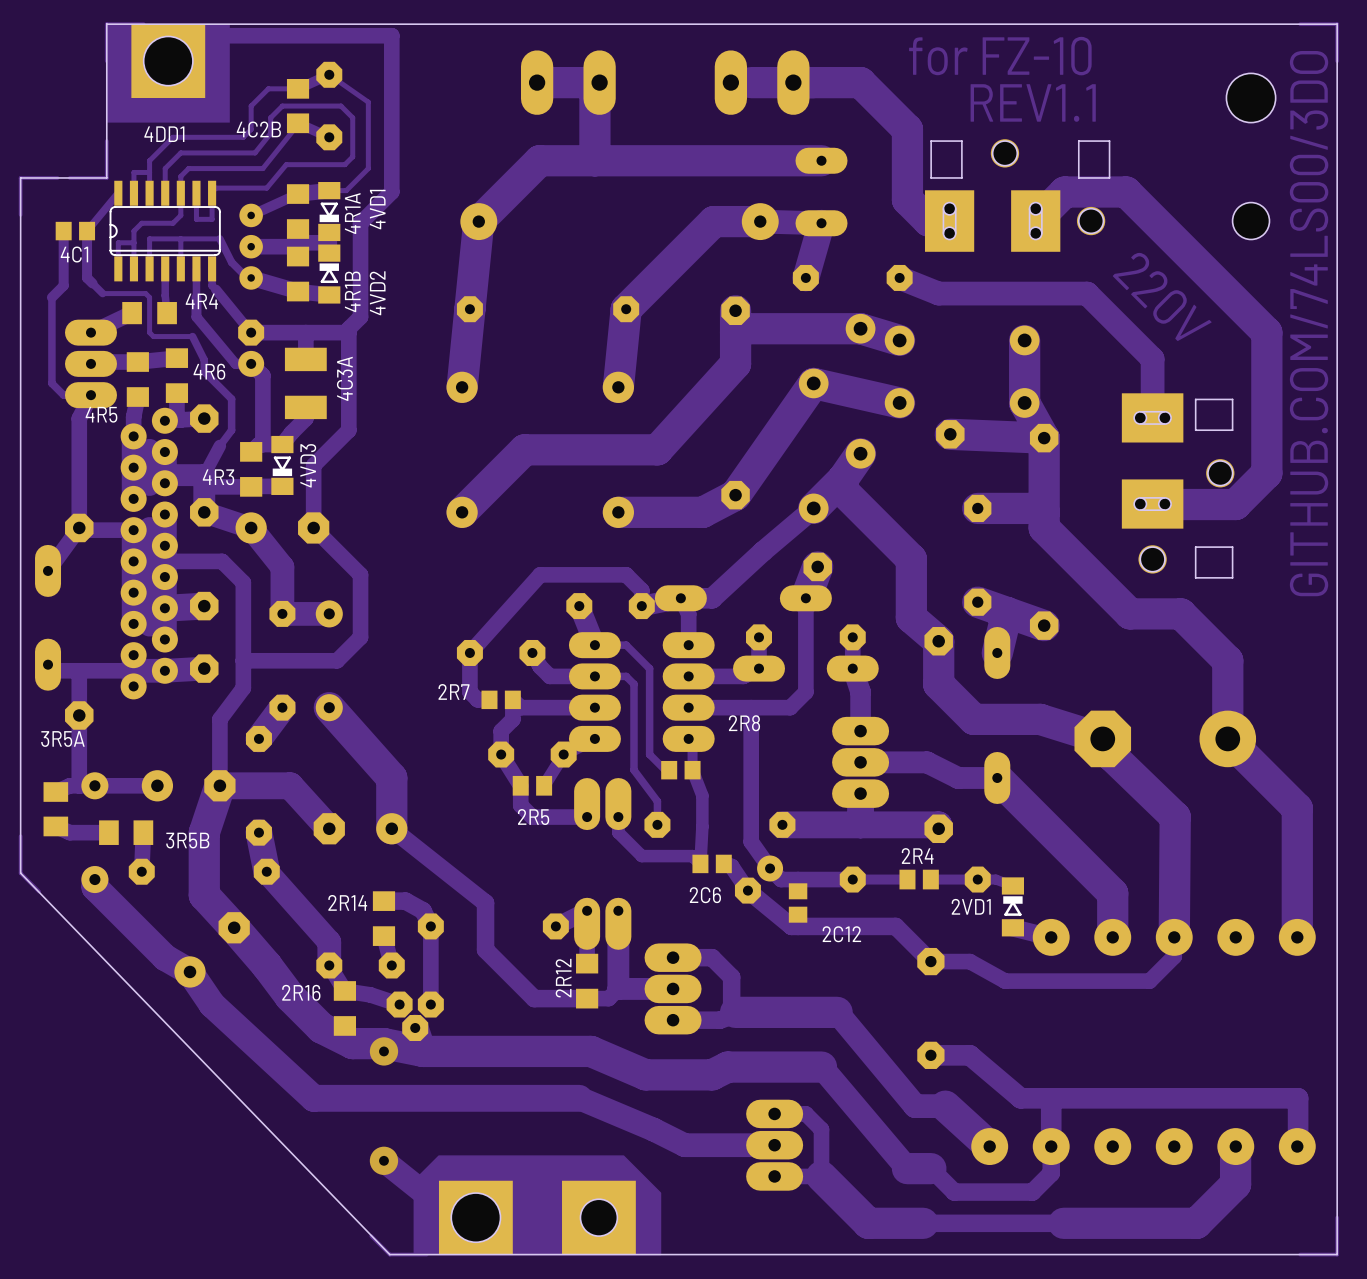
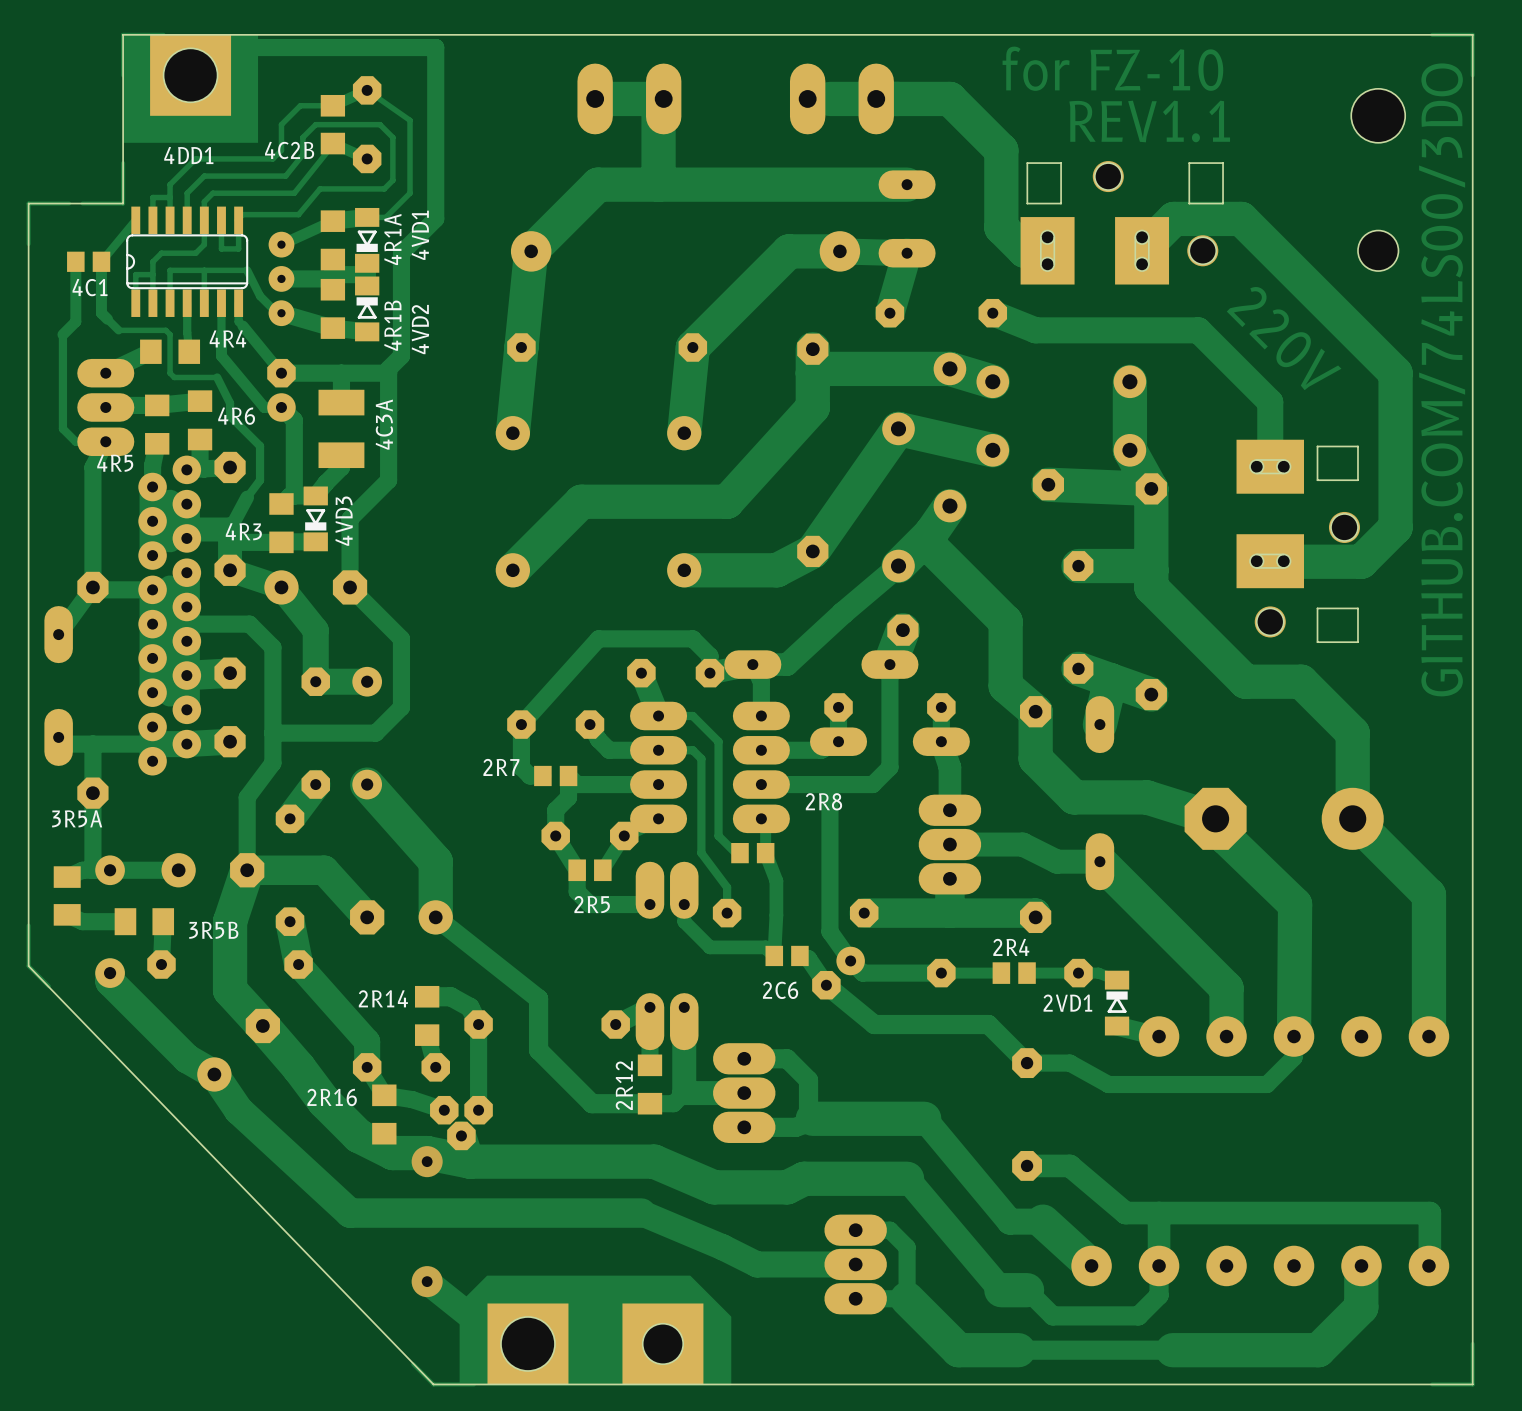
2C12: (798, 902) -> none

